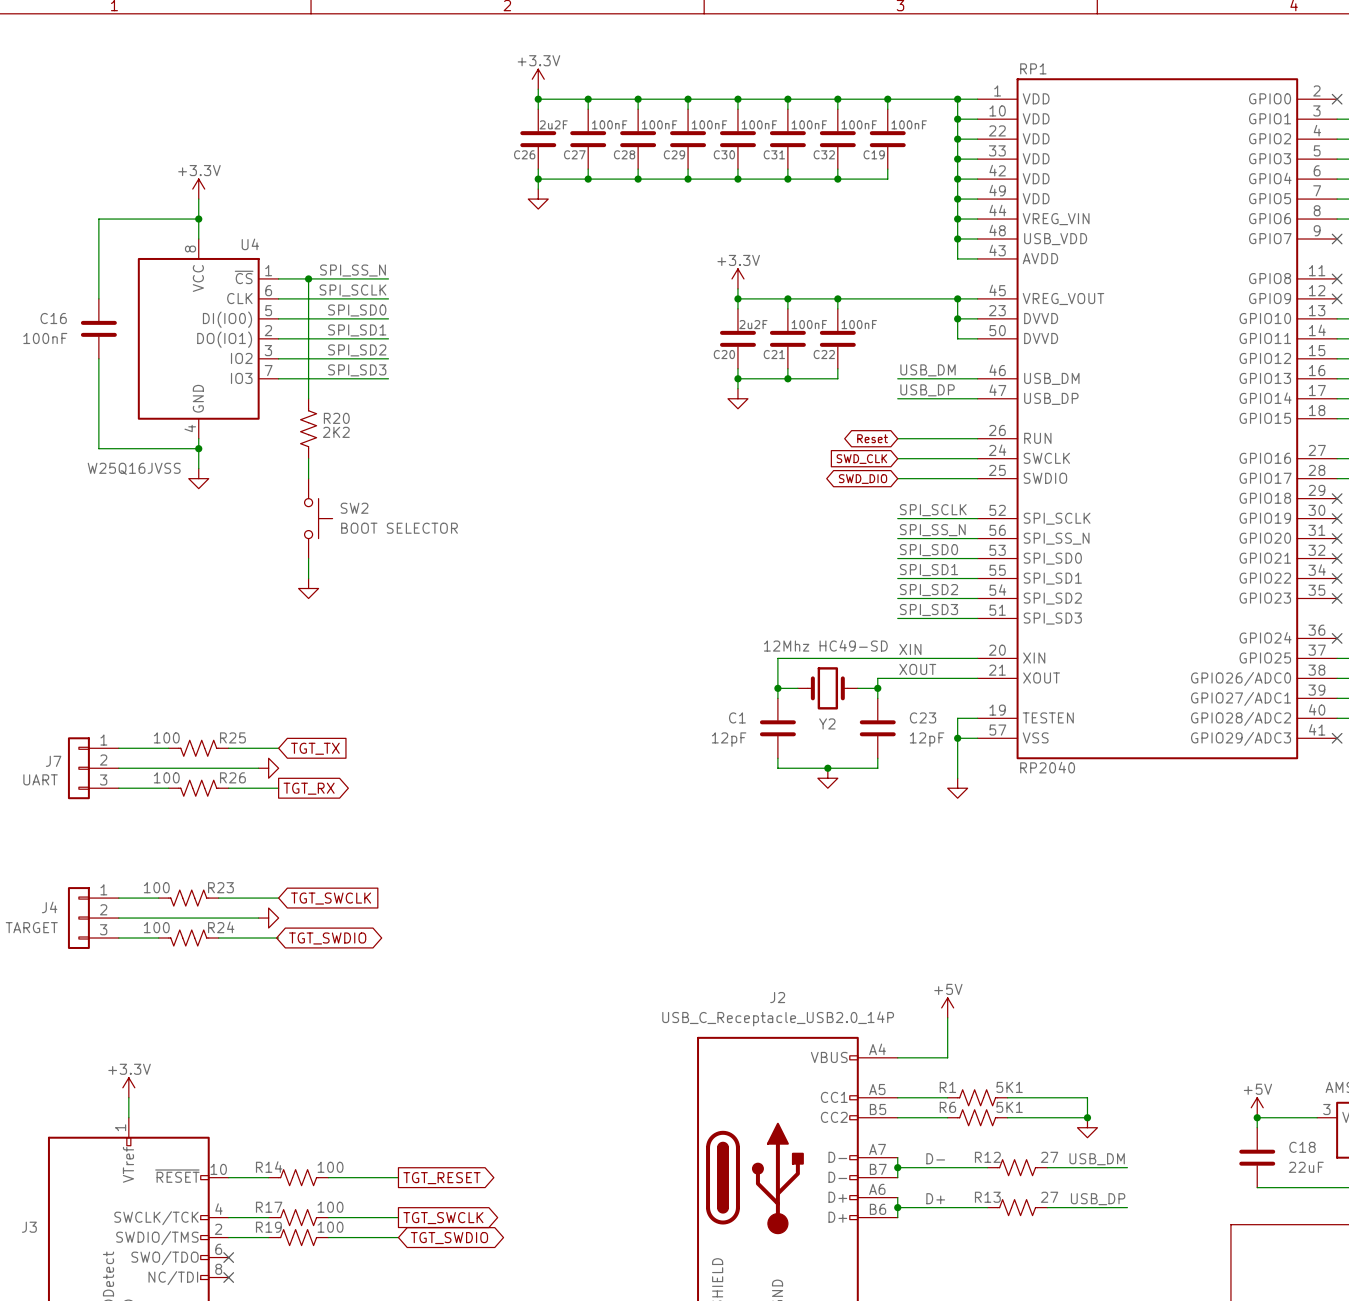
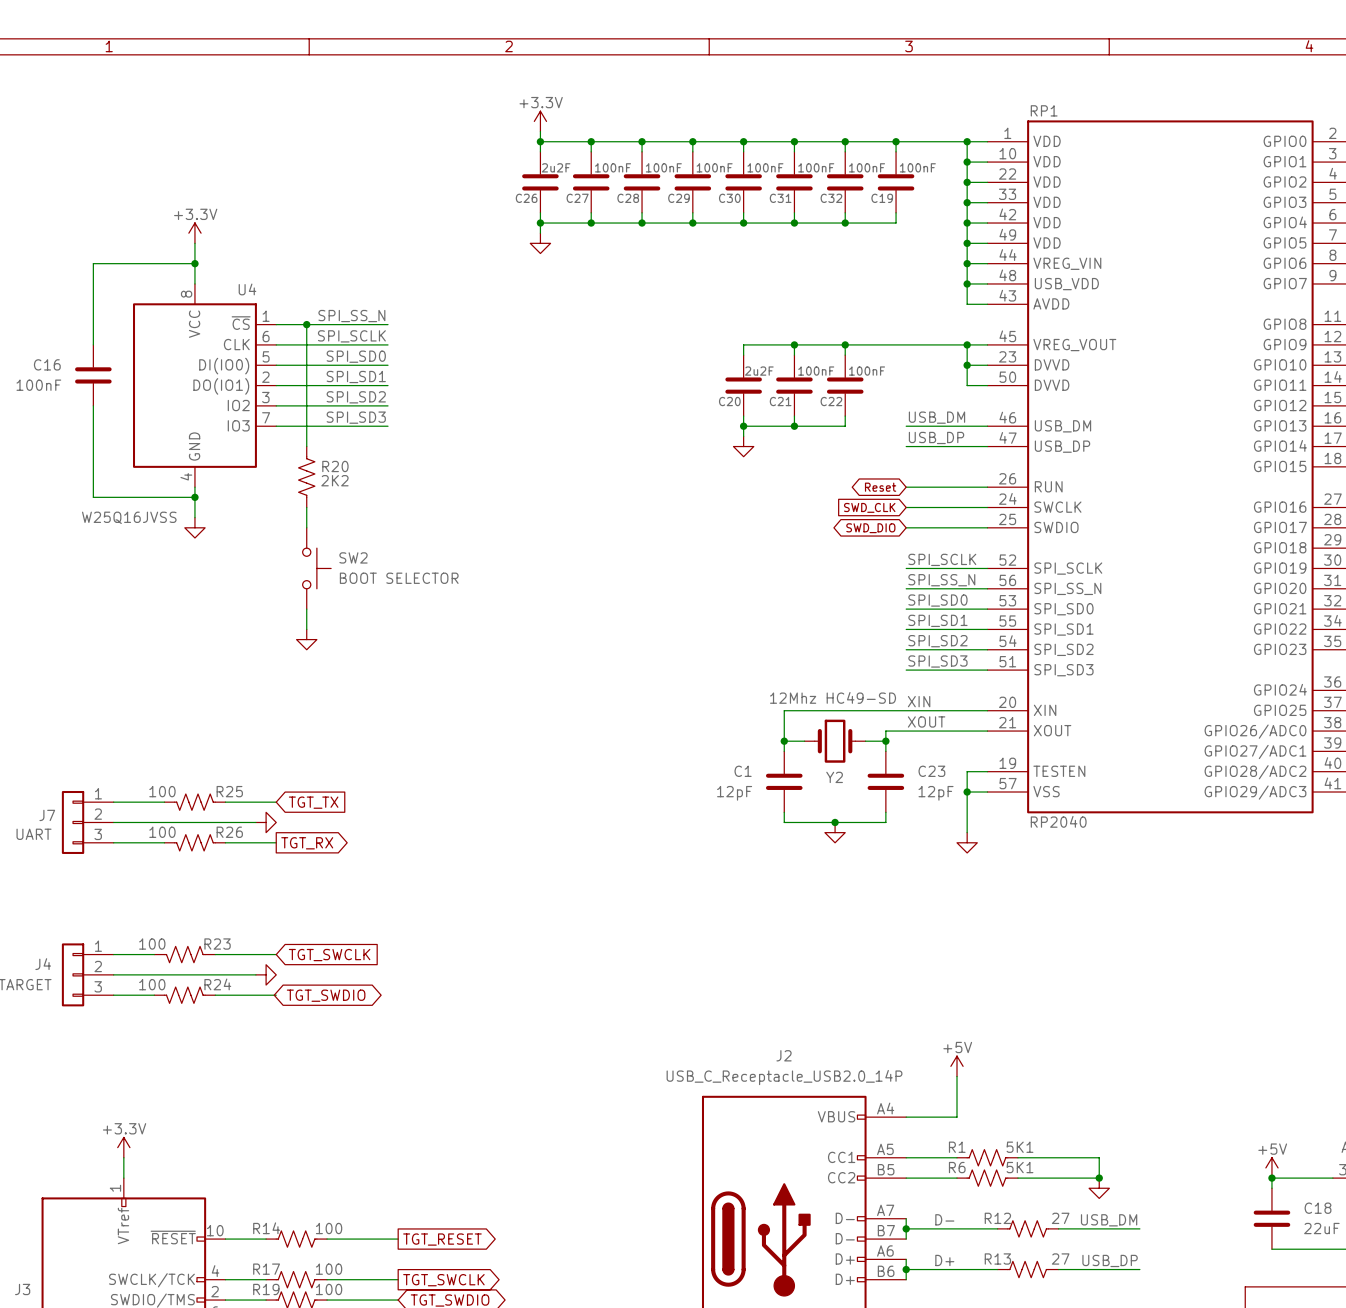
power symbol: +3.3V (737, 278) -> none
wire: (737, 288) (737, 298) -> none
junction: (737, 298) -> none

